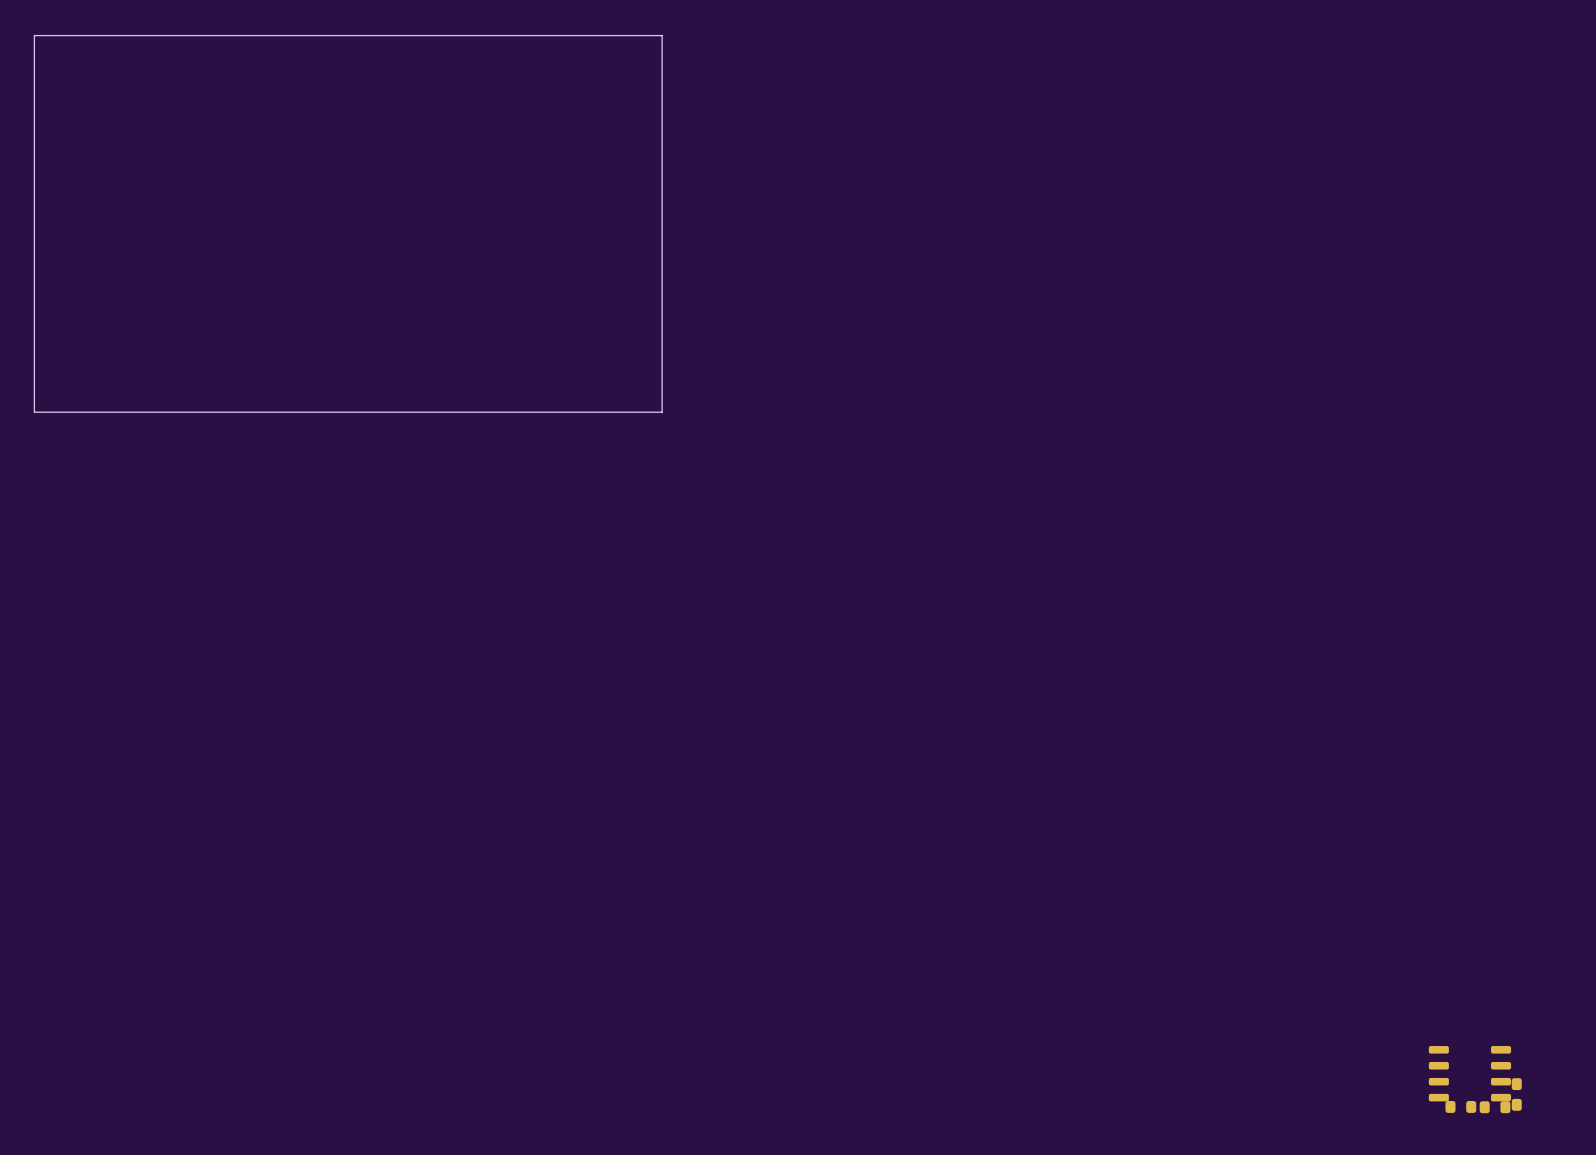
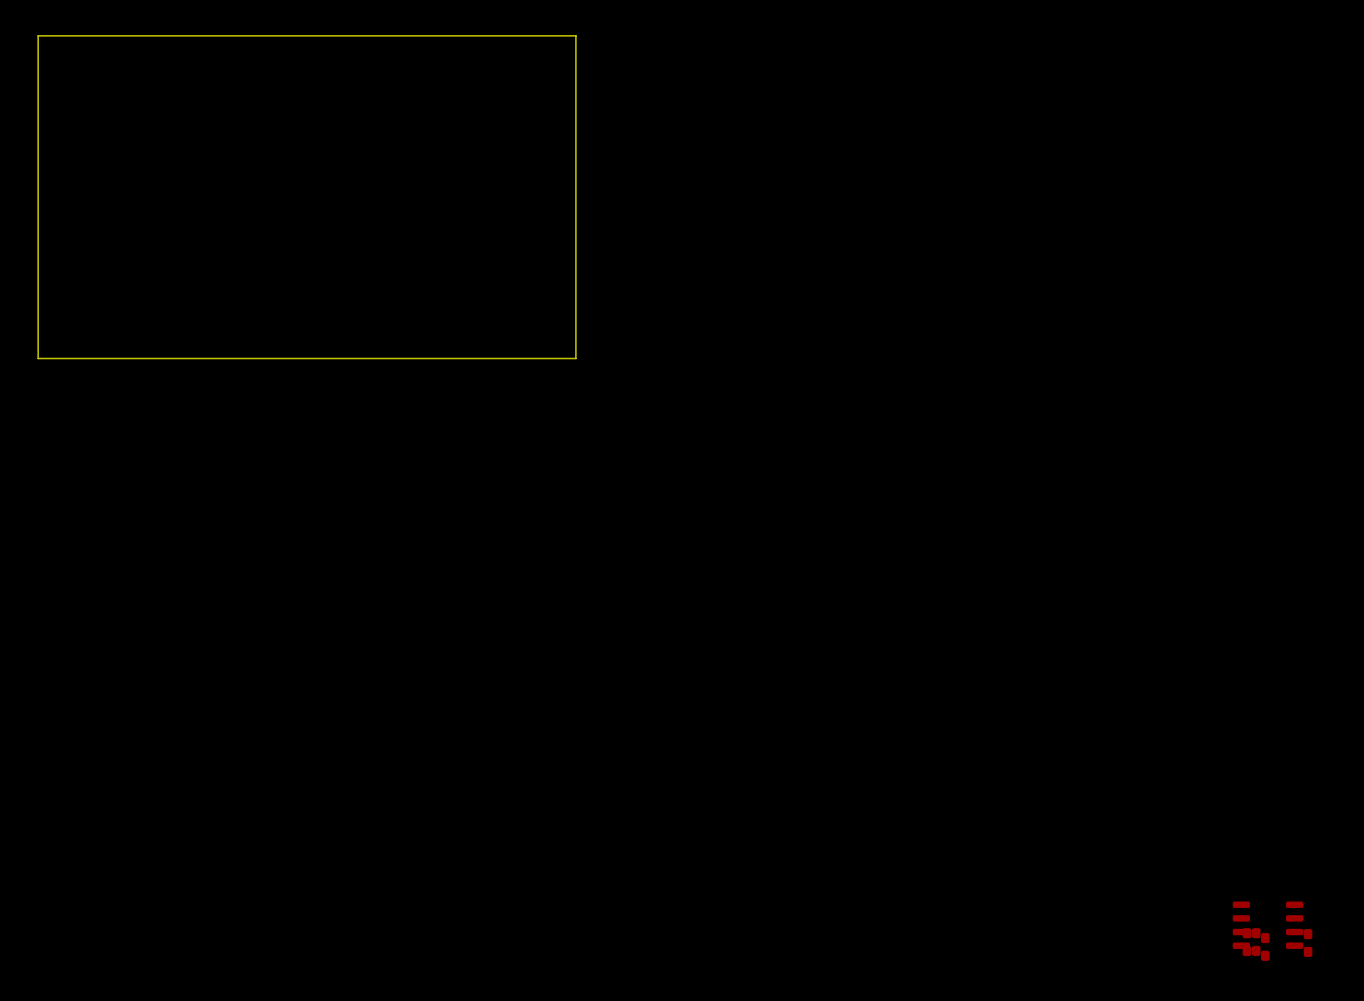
part: none -> (1246, 942)
part: none -> (1256, 942)
part: none -> (1265, 946)
part: (1460, 1106) -> none
part: (1495, 1107) -> none

